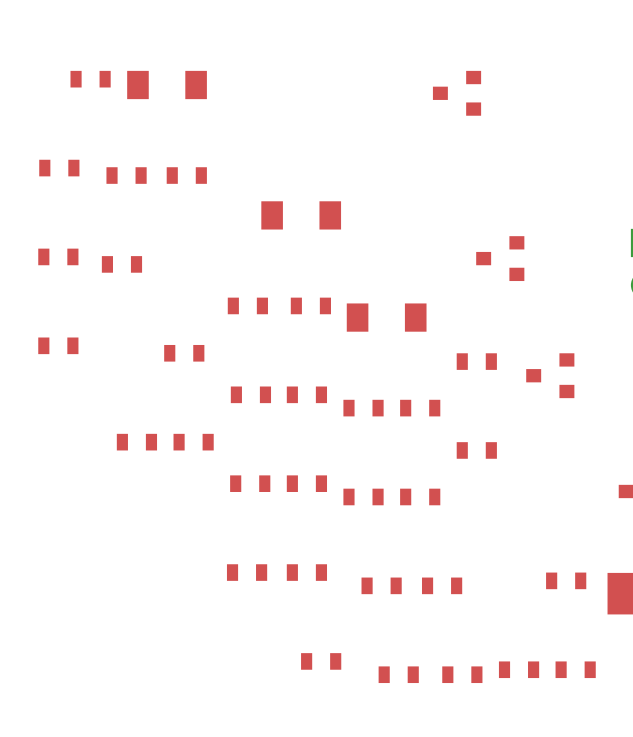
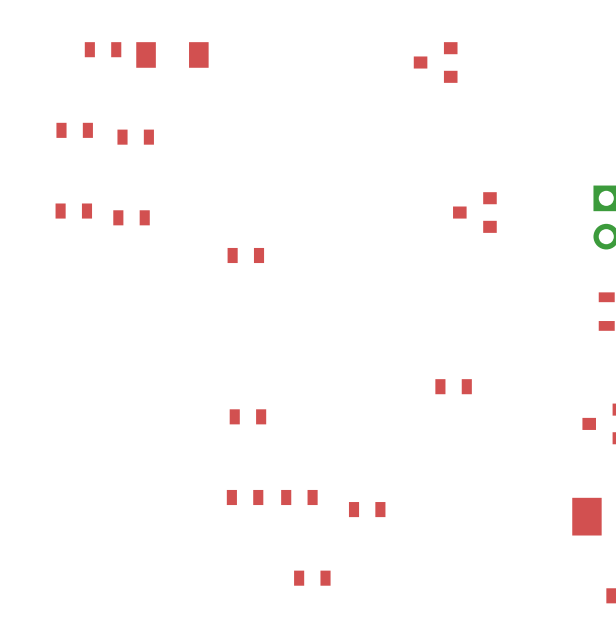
part: (186, 175) -> none
part: (301, 215) -> none
part: (310, 305) -> none
part: (386, 317) -> none
part: (58, 345) -> none
part: (184, 353) -> none
part: (476, 361) -> none
part: (550, 375) -> none
part: (250, 394) -> none
part: (306, 394) -> none
part: (363, 408) -> none
part: (420, 408) -> none
part: (136, 442) -> none
part: (193, 442) -> none
part: (306, 483) -> none
part: (363, 496) -> none
part: (420, 496) -> none
part: (566, 580) -> none
part: (442, 585) -> none
part: (519, 669) -> none
part: (575, 669) -> none
part: (398, 674) -> none
part: (462, 674) -> none

